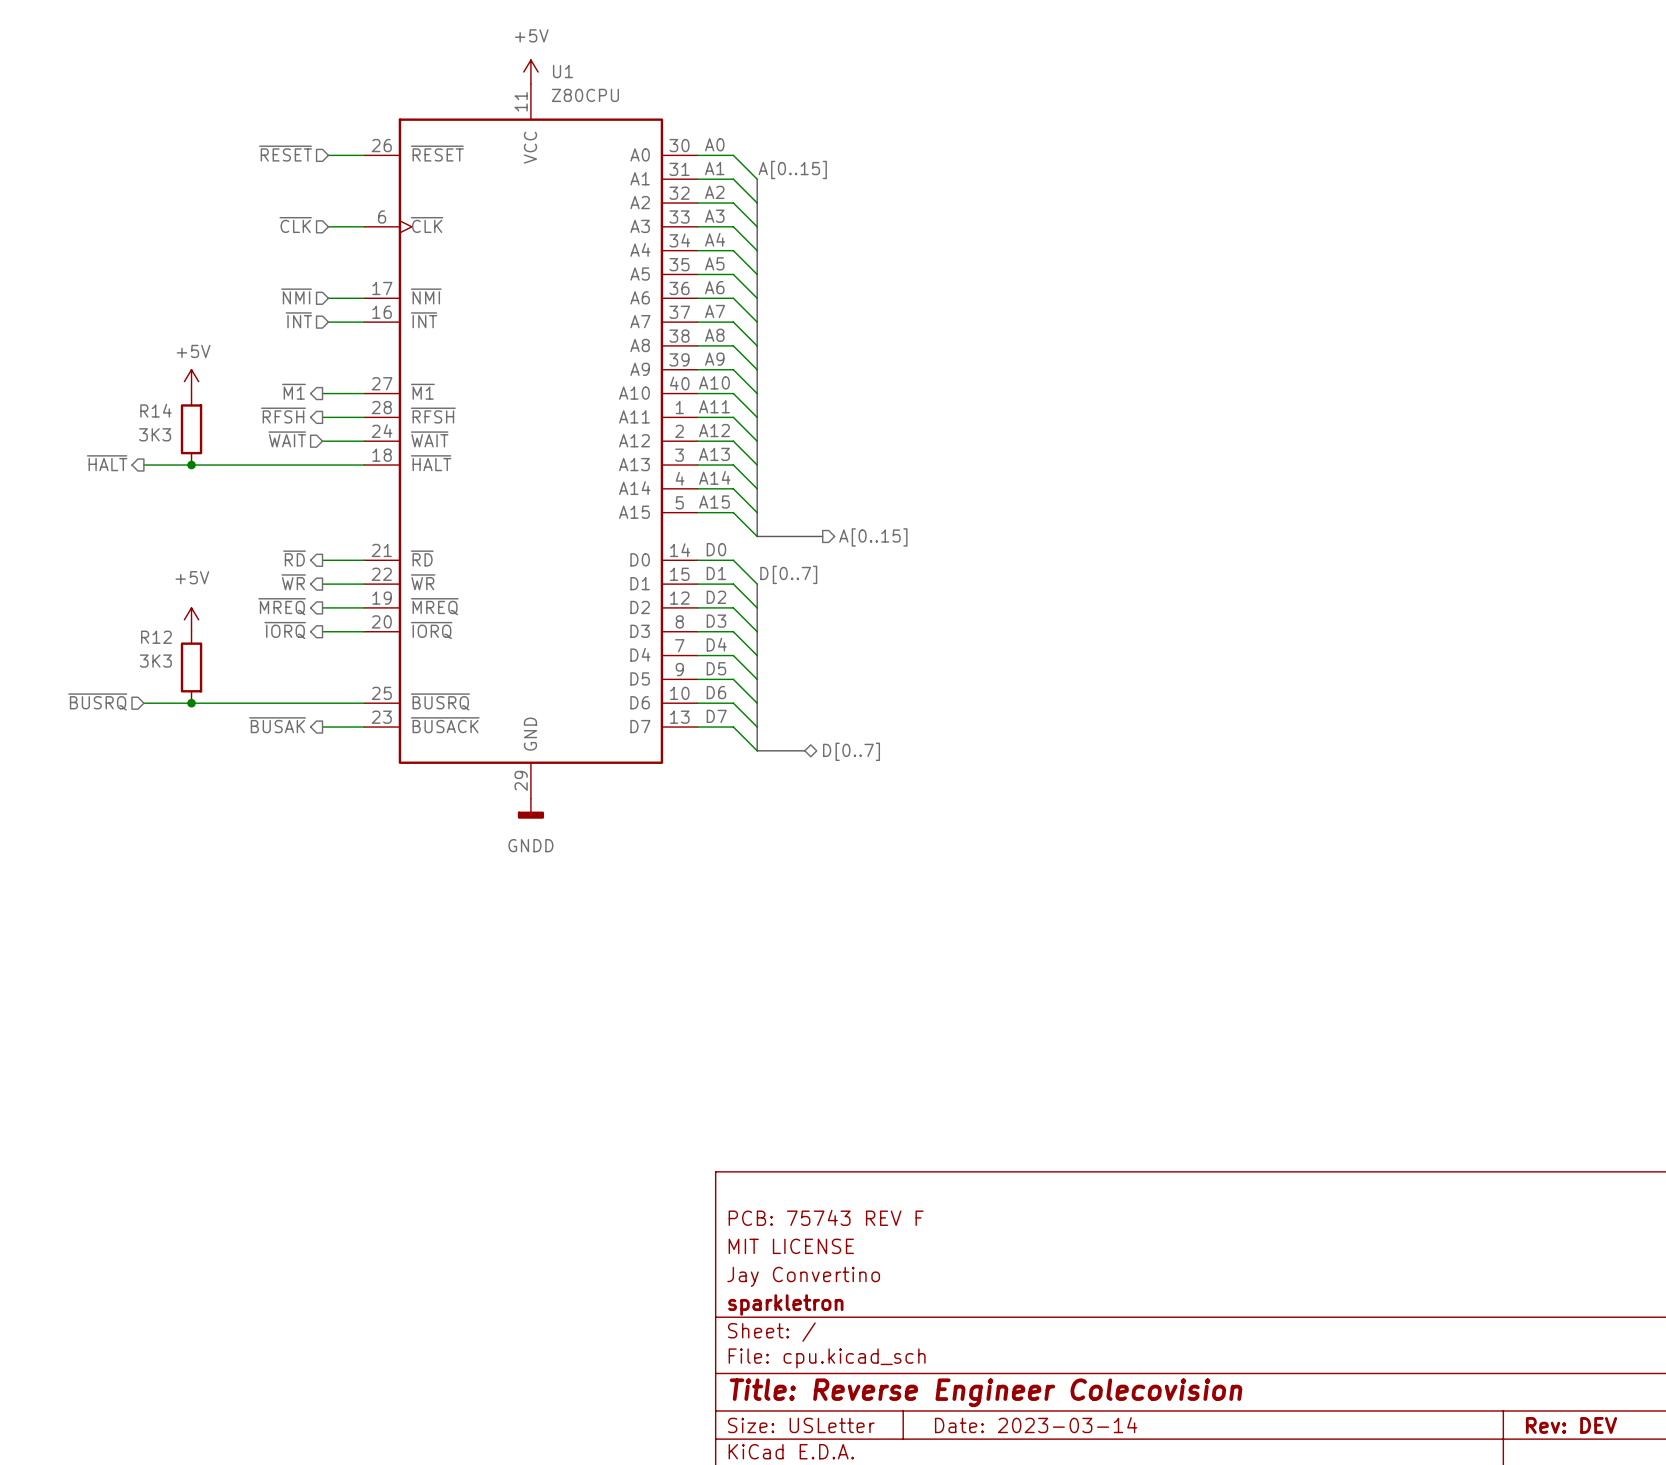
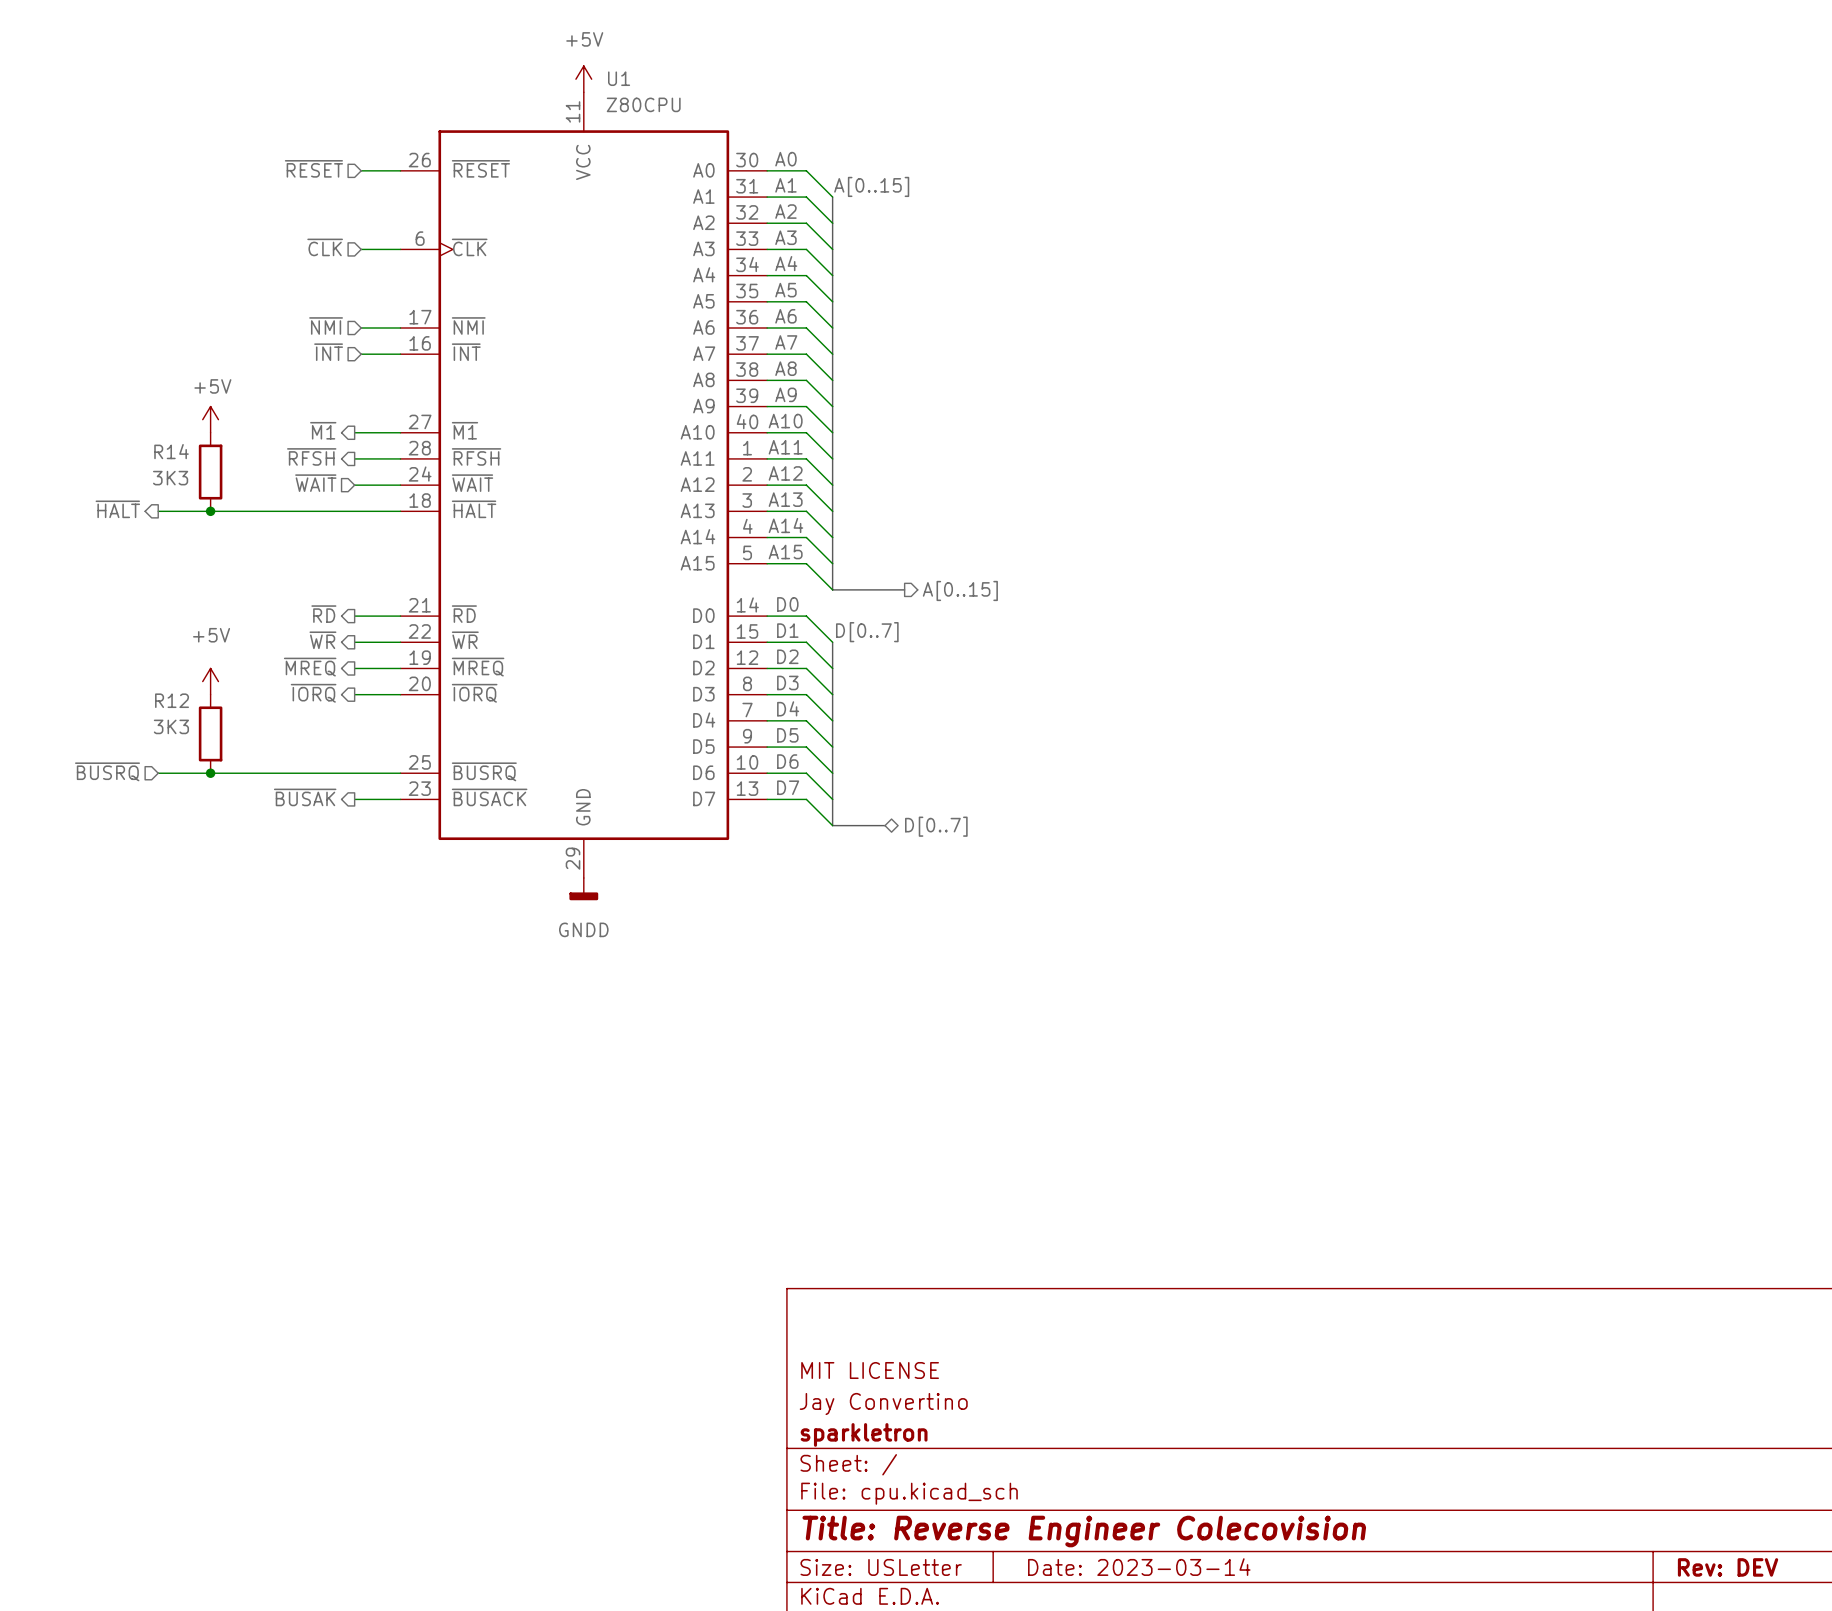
title block: PCB: 75743 REV F (826, 1217) -> none

